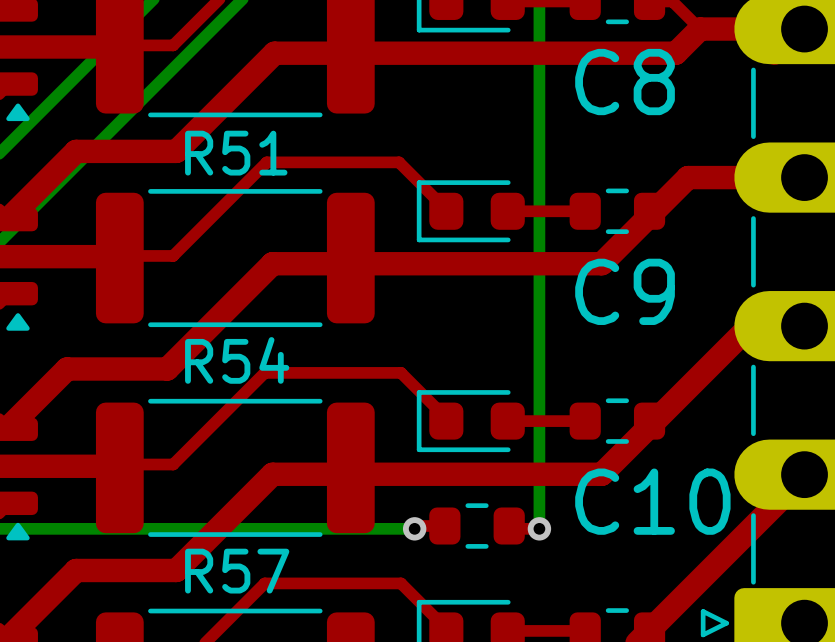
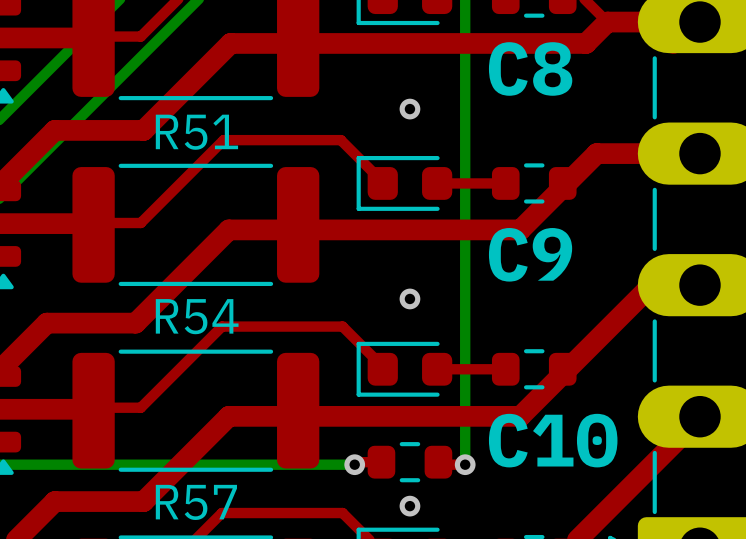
via: none -> (409, 109)
via: none -> (409, 298)
via: none -> (409, 506)

